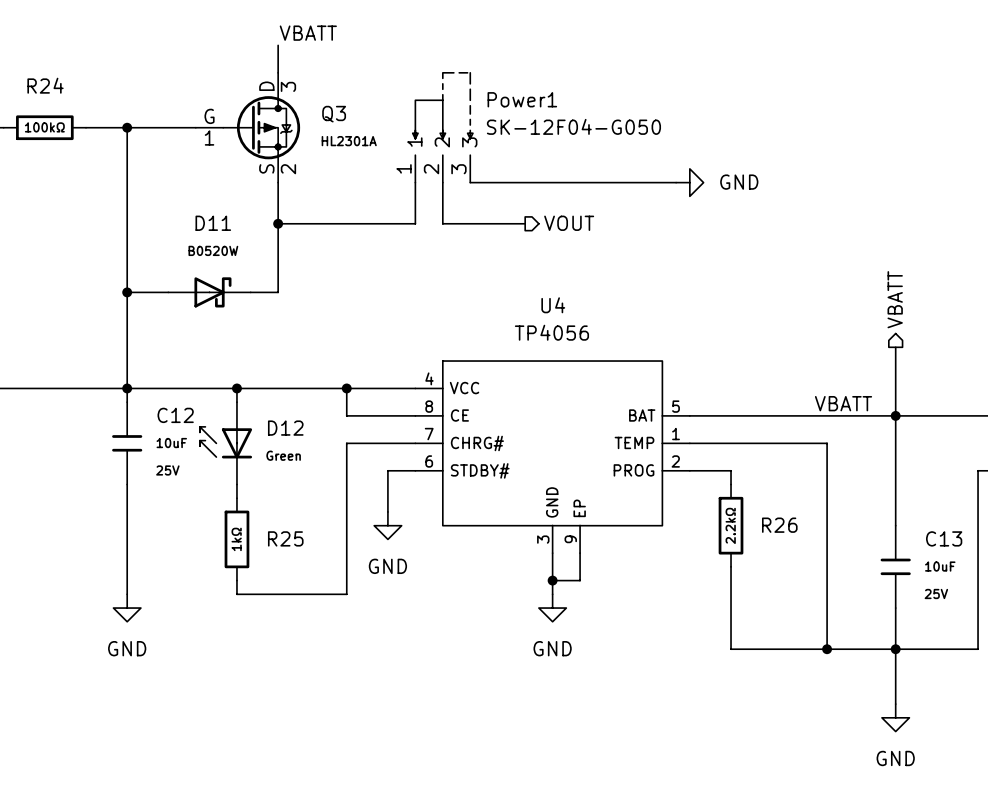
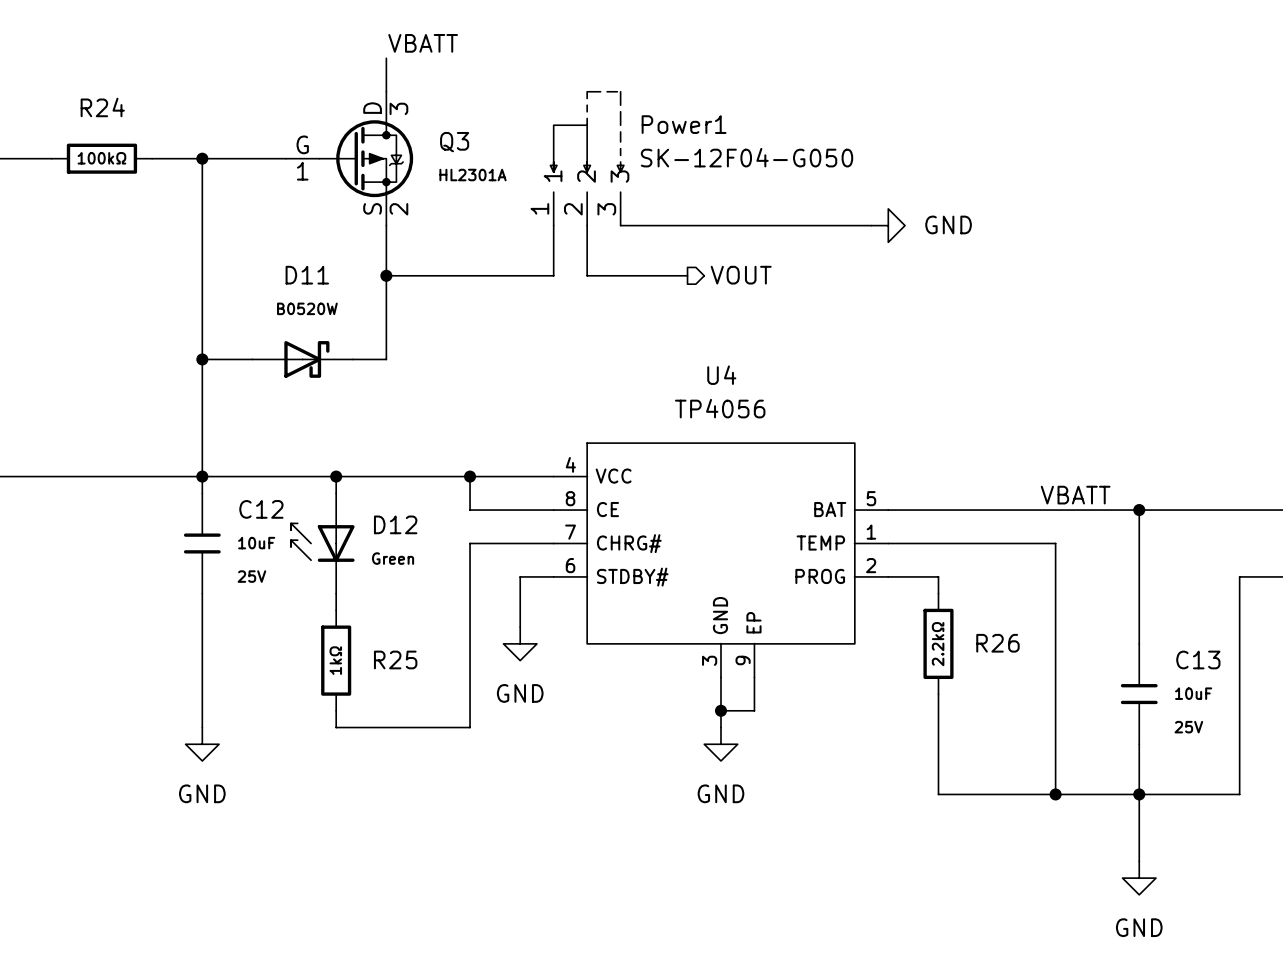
hierarchical label: VBATT (895, 299) -> none
wire: (895, 347) (895, 415) -> none

